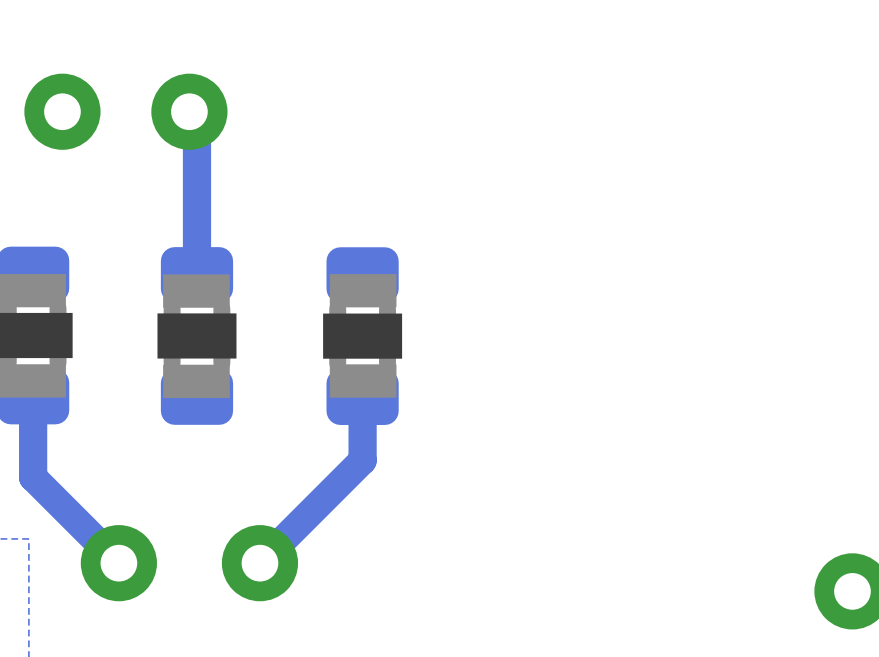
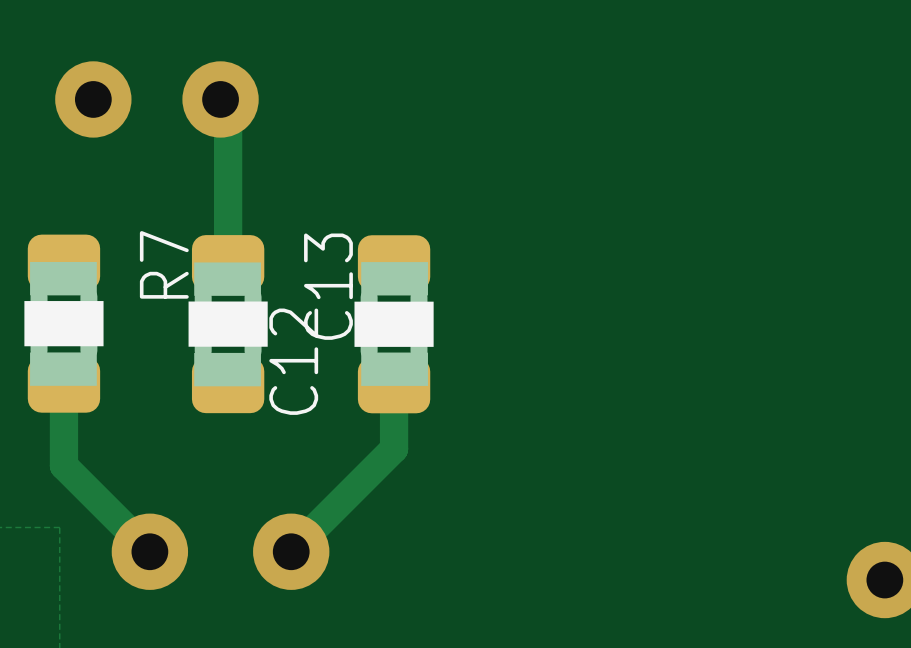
R7 name: none -> R7 (164, 264)
C13 name: none -> C13 (328, 286)
C12 name: none -> C12 (293, 361)

